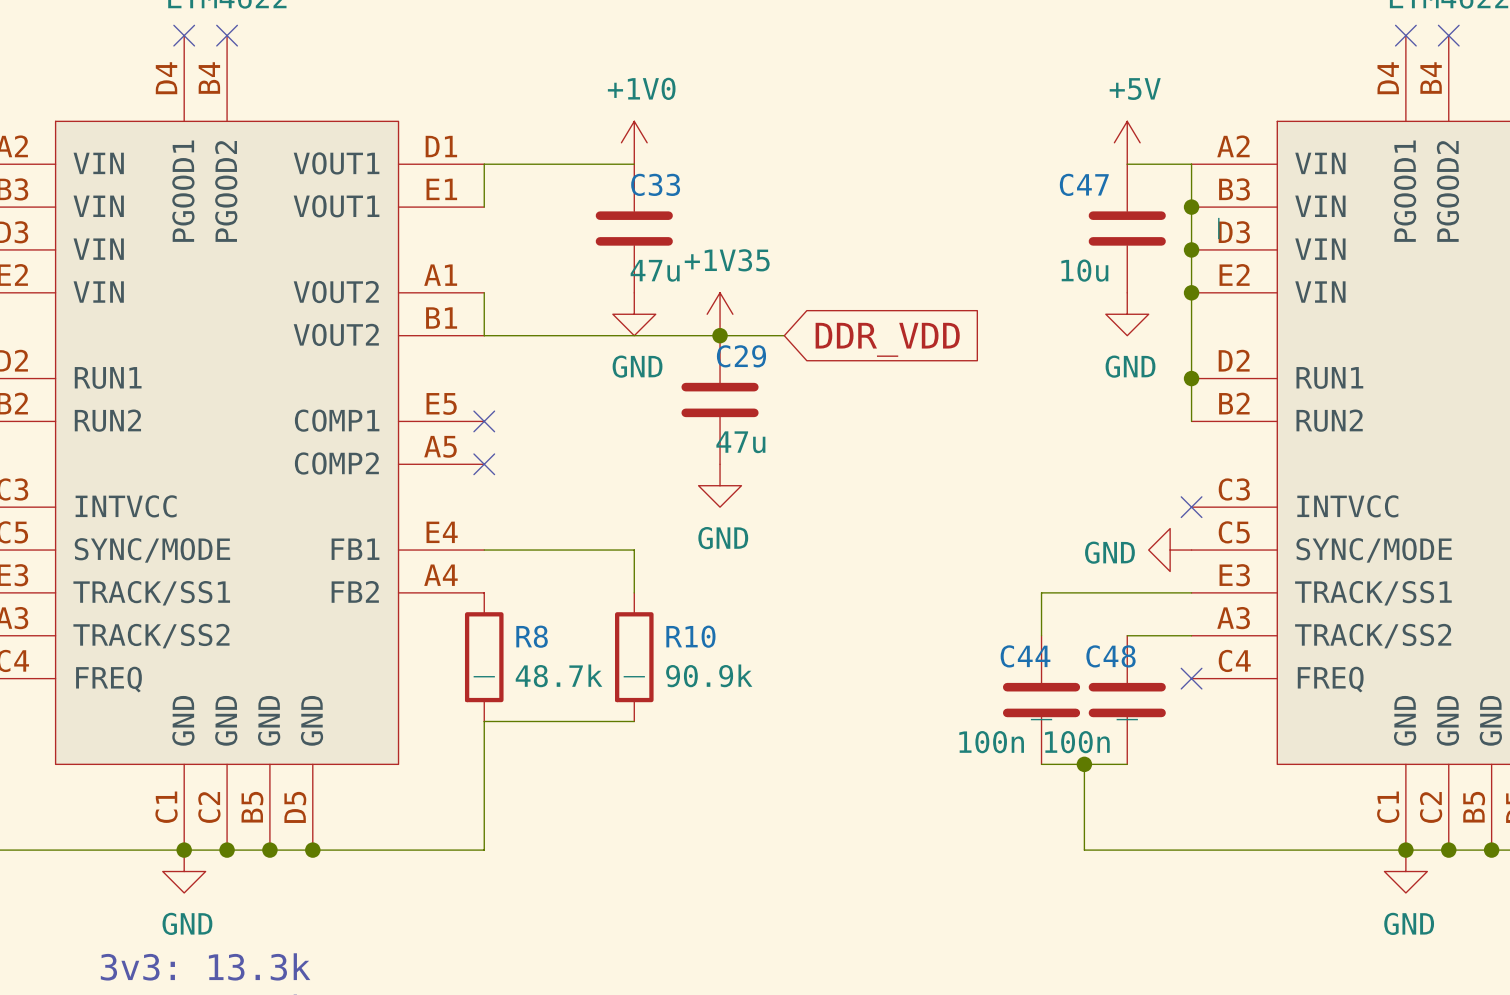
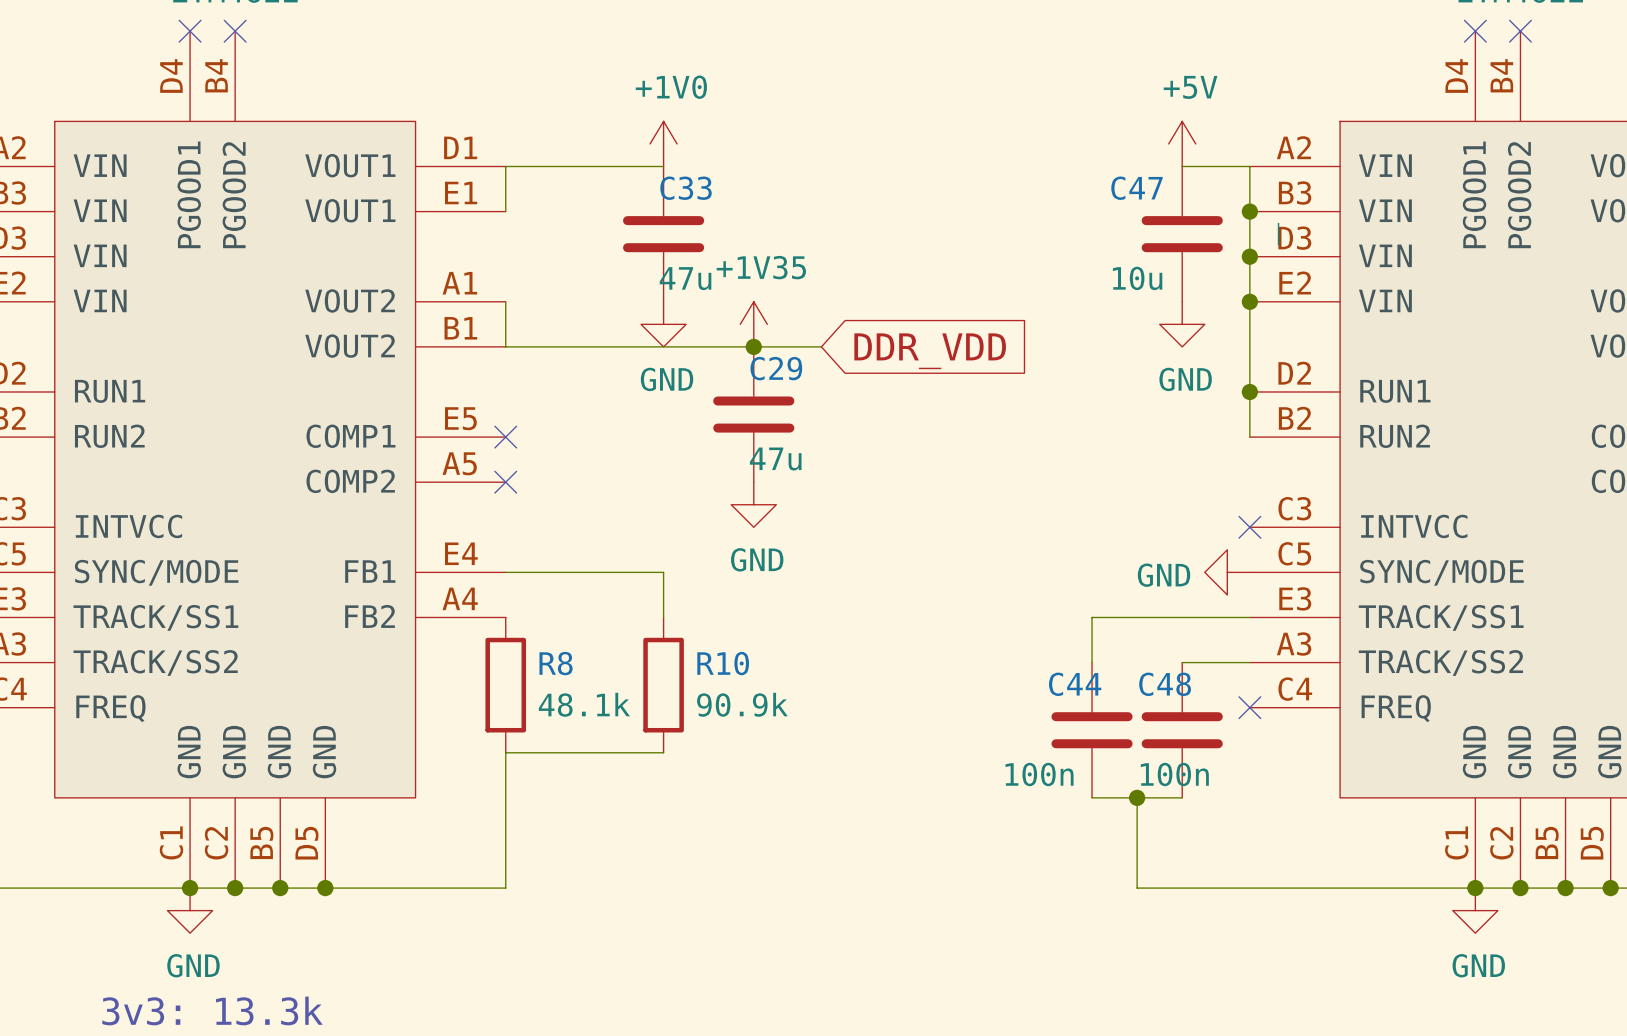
R8 value: 48.7k (559, 675) -> 48.1k (584, 704)
R8 text: _ (484, 676) -> none
R10 text: _ (634, 676) -> none
C44 text: _ (1041, 719) -> none
C48 text: _ (1127, 719) -> none
C48 value position: 100n (1077, 742) -> 100n (1174, 774)

